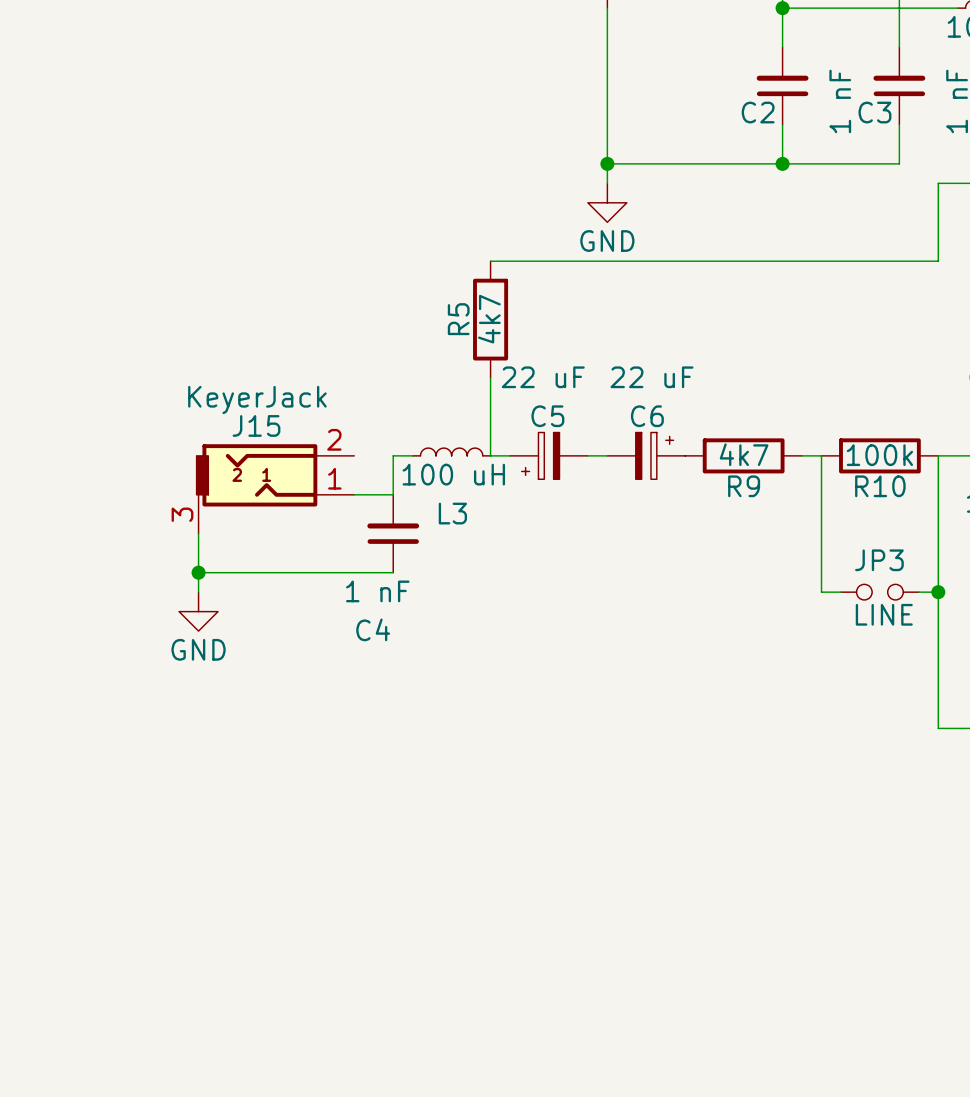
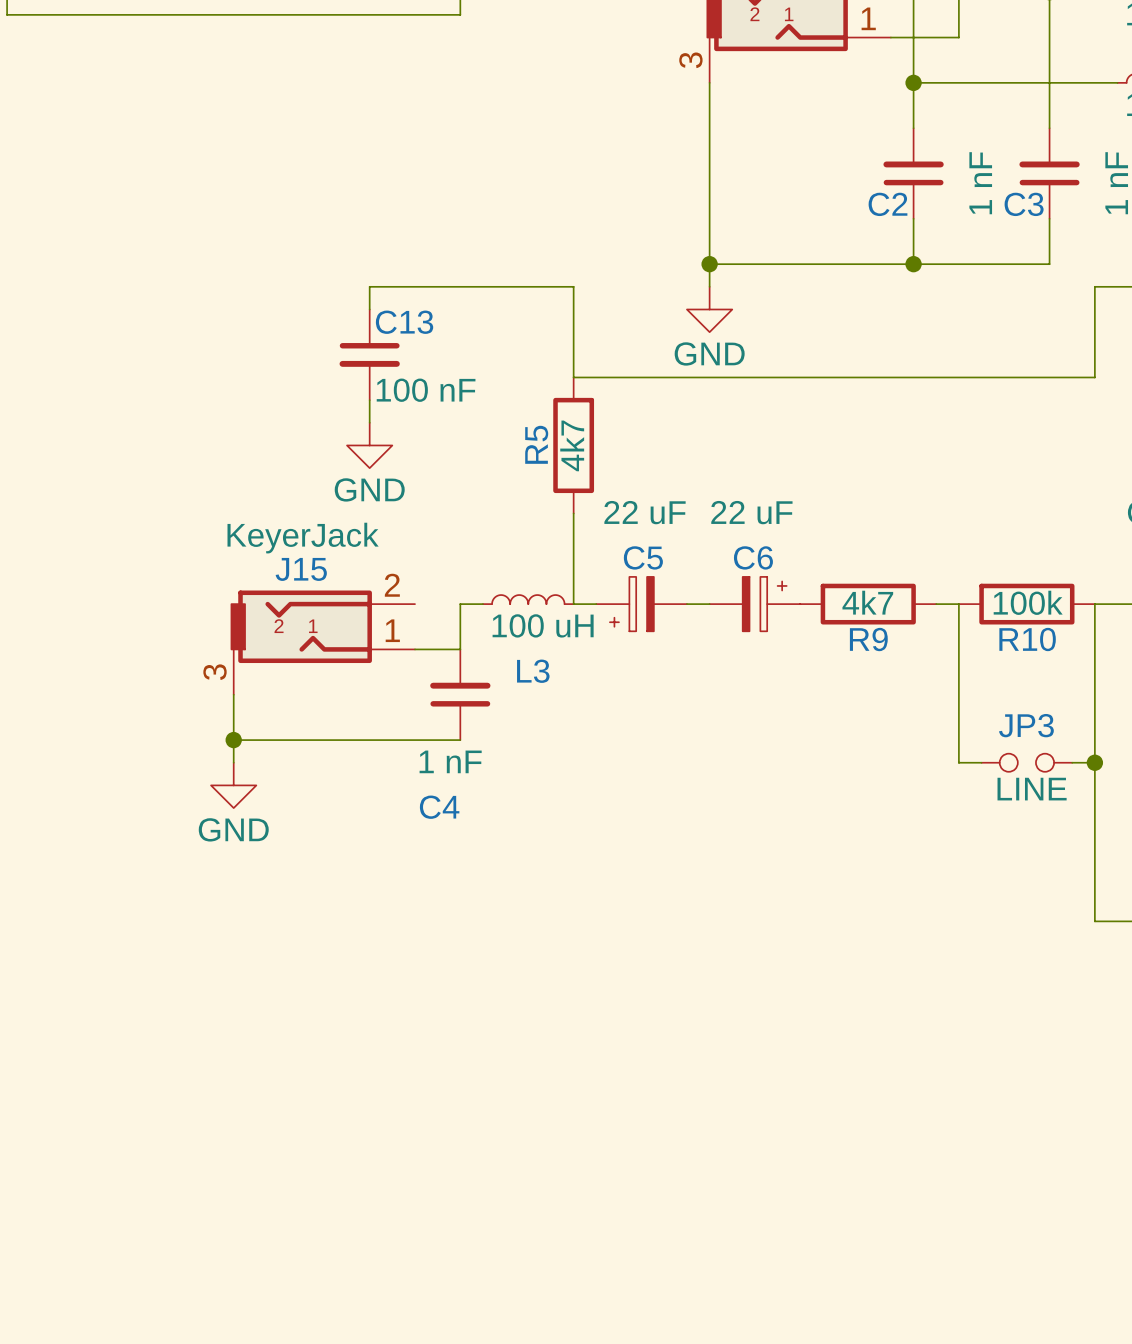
wire: none -> (369, 309) (369, 286) (573, 286) (573, 377)
C13: none -> 100 nF (369, 354)
wire: none -> (369, 400) (369, 422)
power symbol: none -> GND (369, 445)

